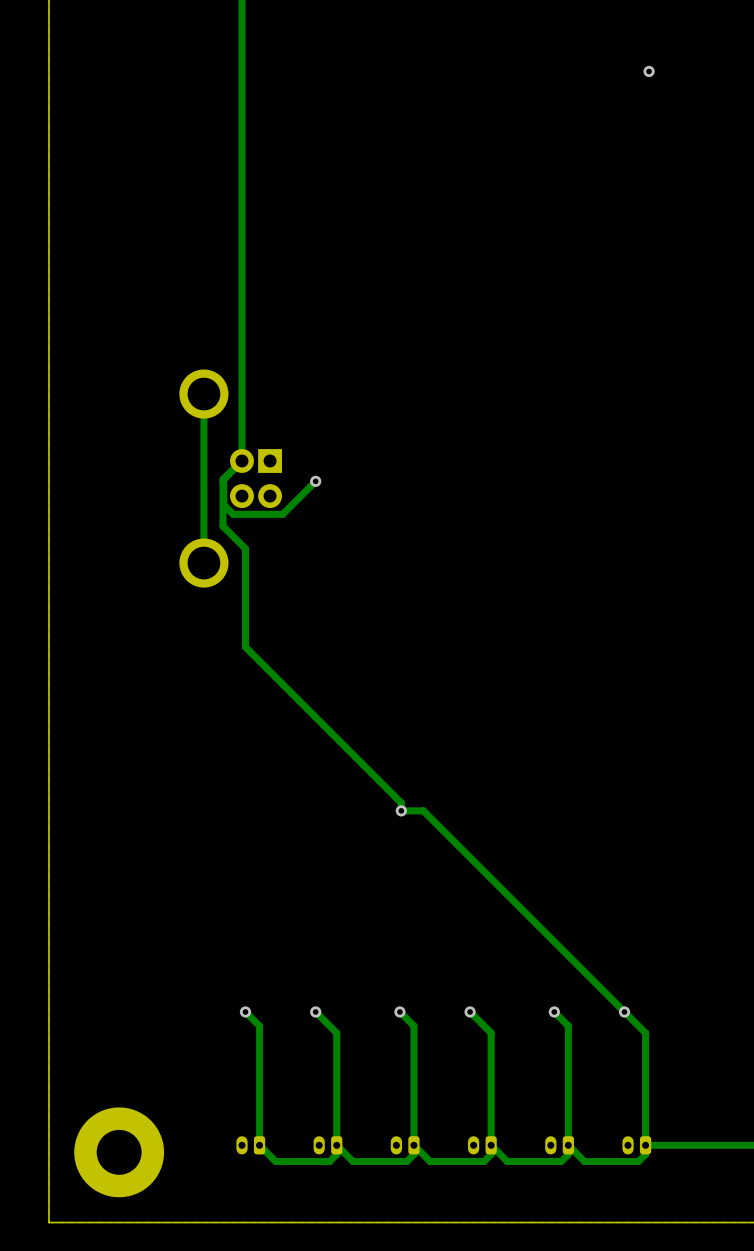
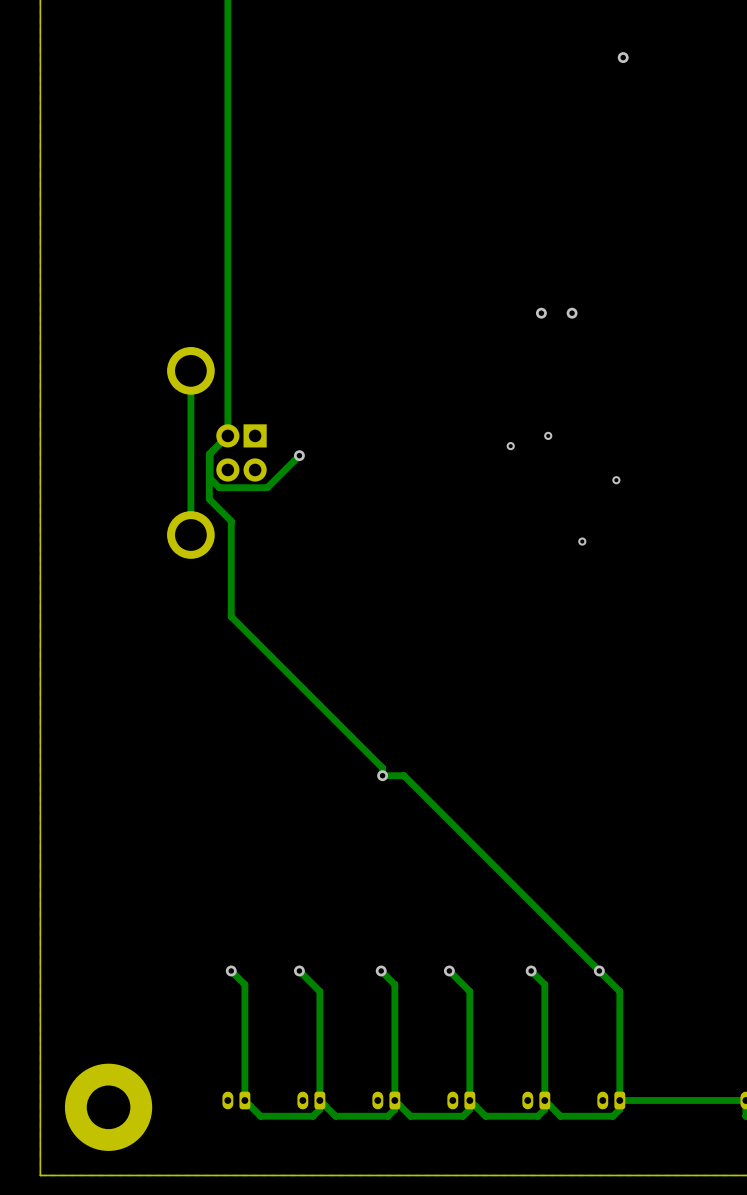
via: none -> (541, 313)
via: none -> (572, 313)
via: none -> (548, 435)
via: none -> (510, 446)
via: none -> (616, 480)
via: none -> (582, 541)

